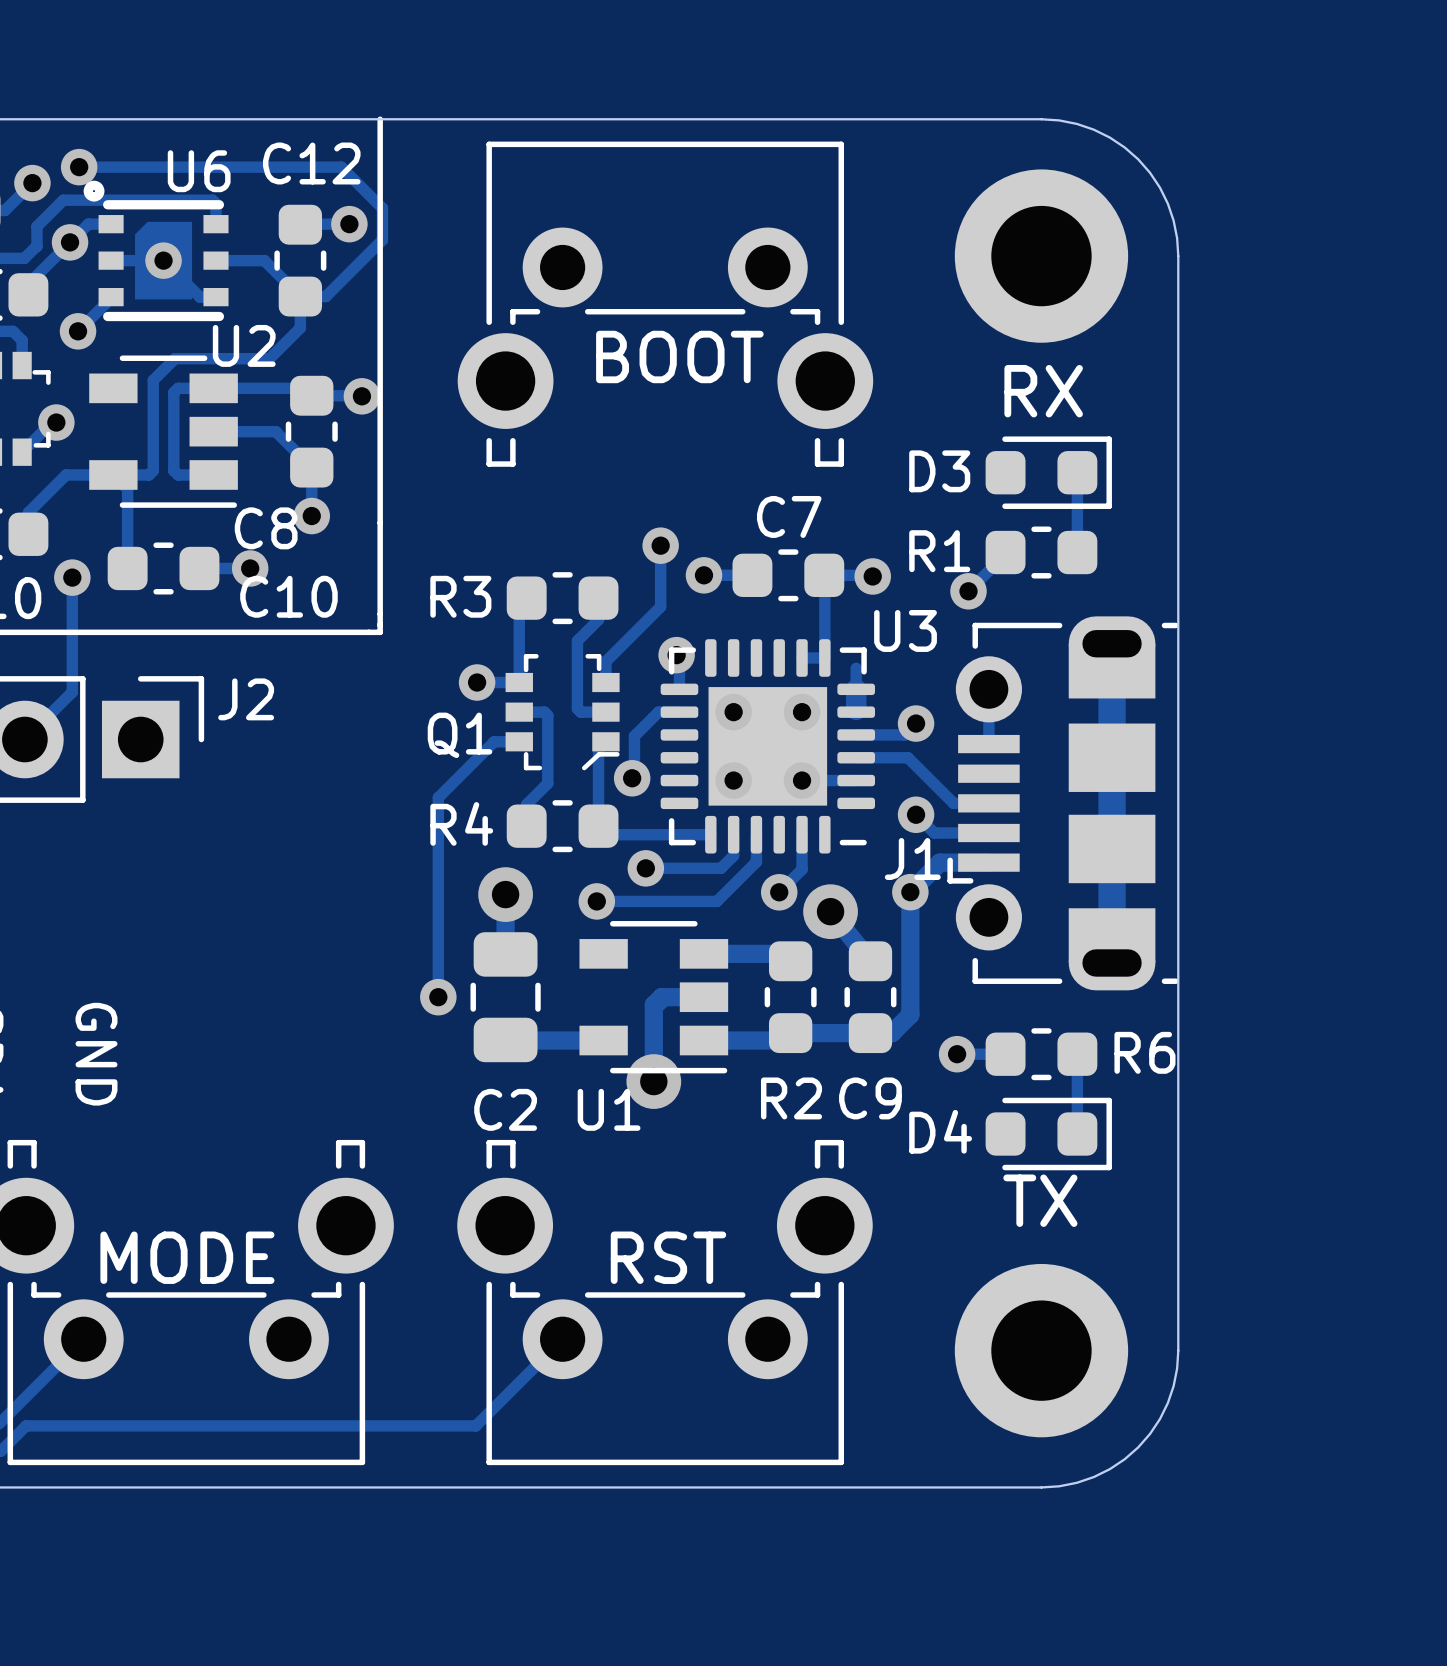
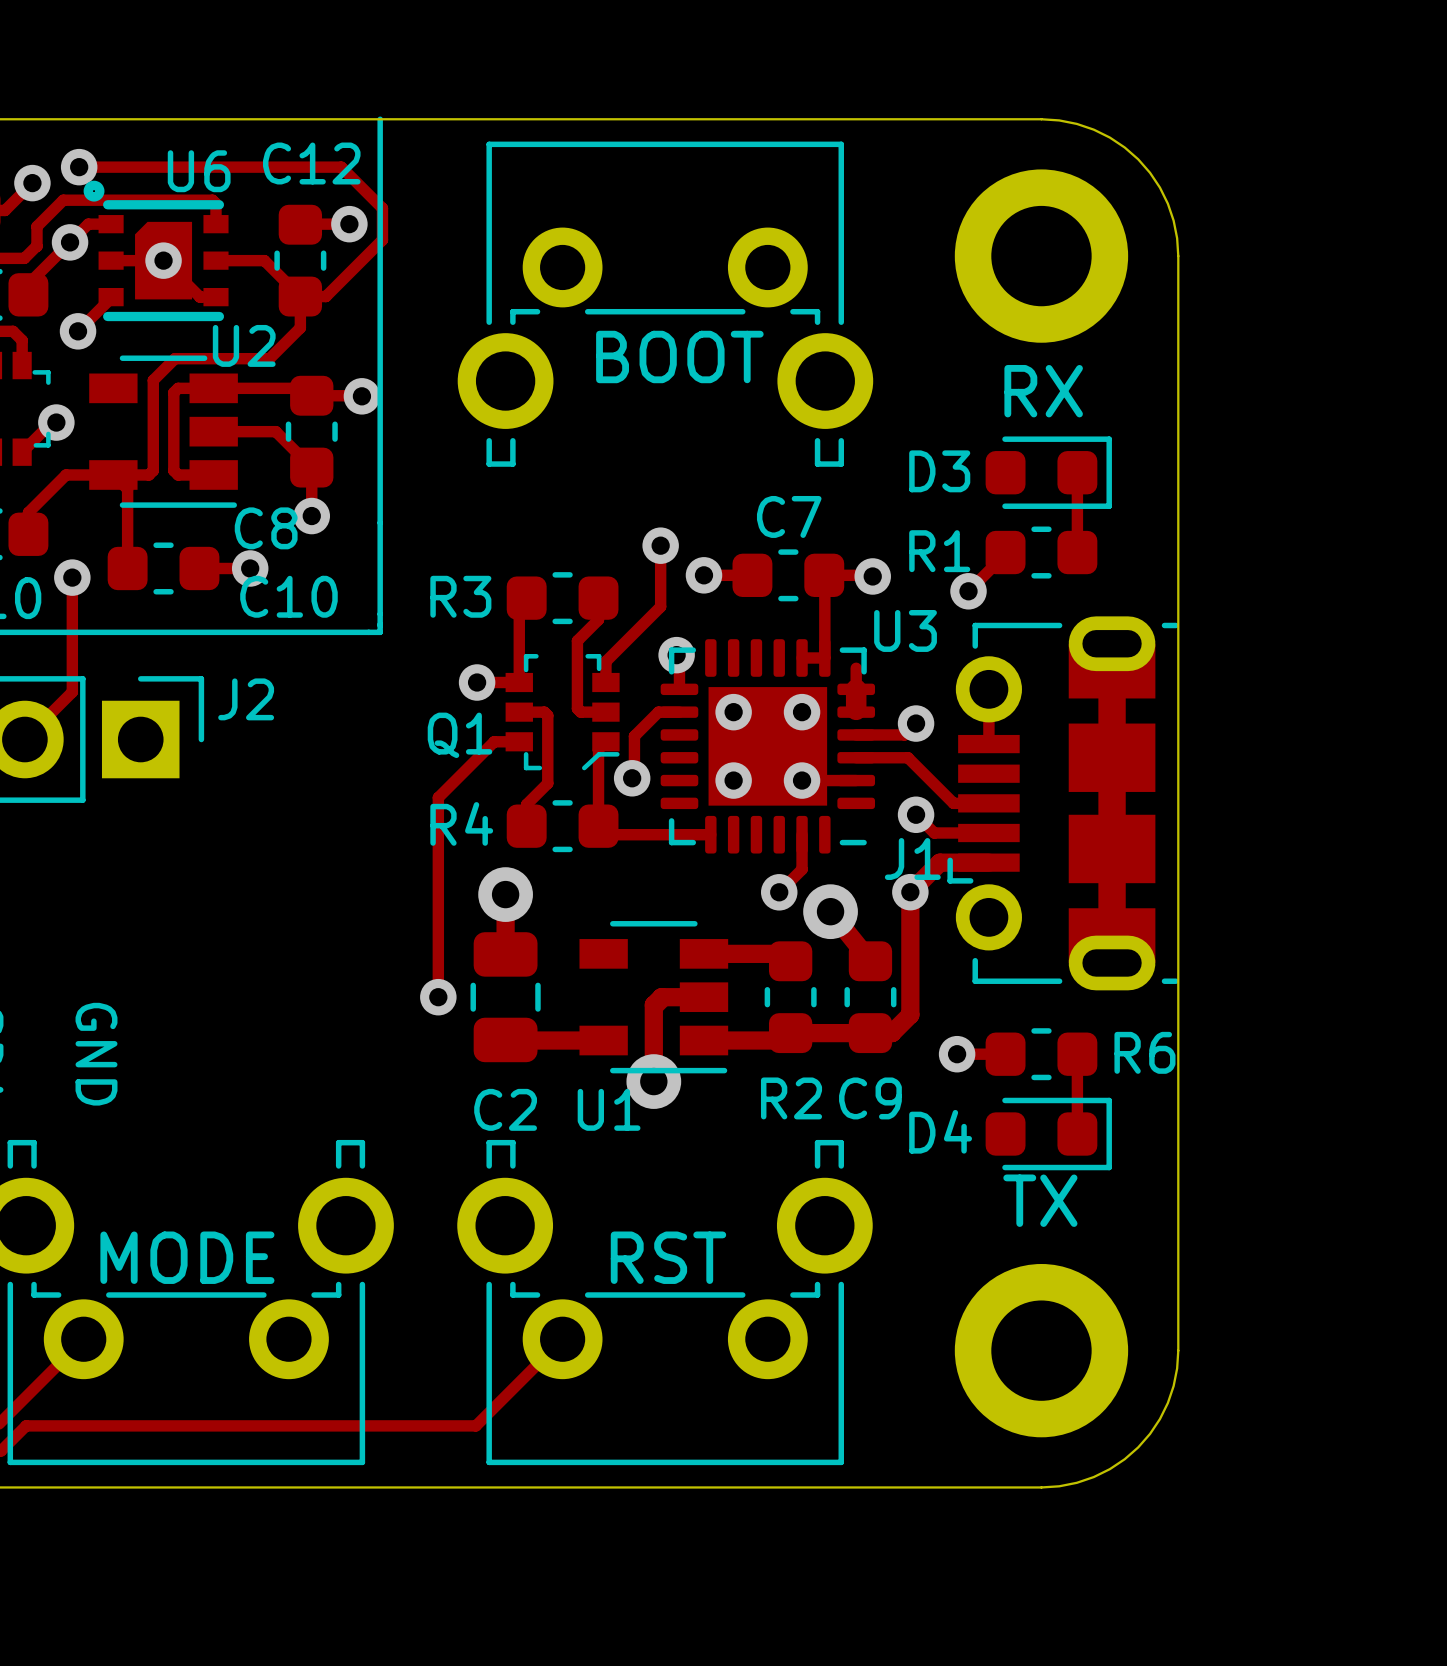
track: (733, 834) (733, 855) (721, 868) (641, 868) -> none
track: (756, 834) (756, 861) (716, 901) (596, 901) -> none
via: (645, 868) -> none
via: (596, 901) -> none

